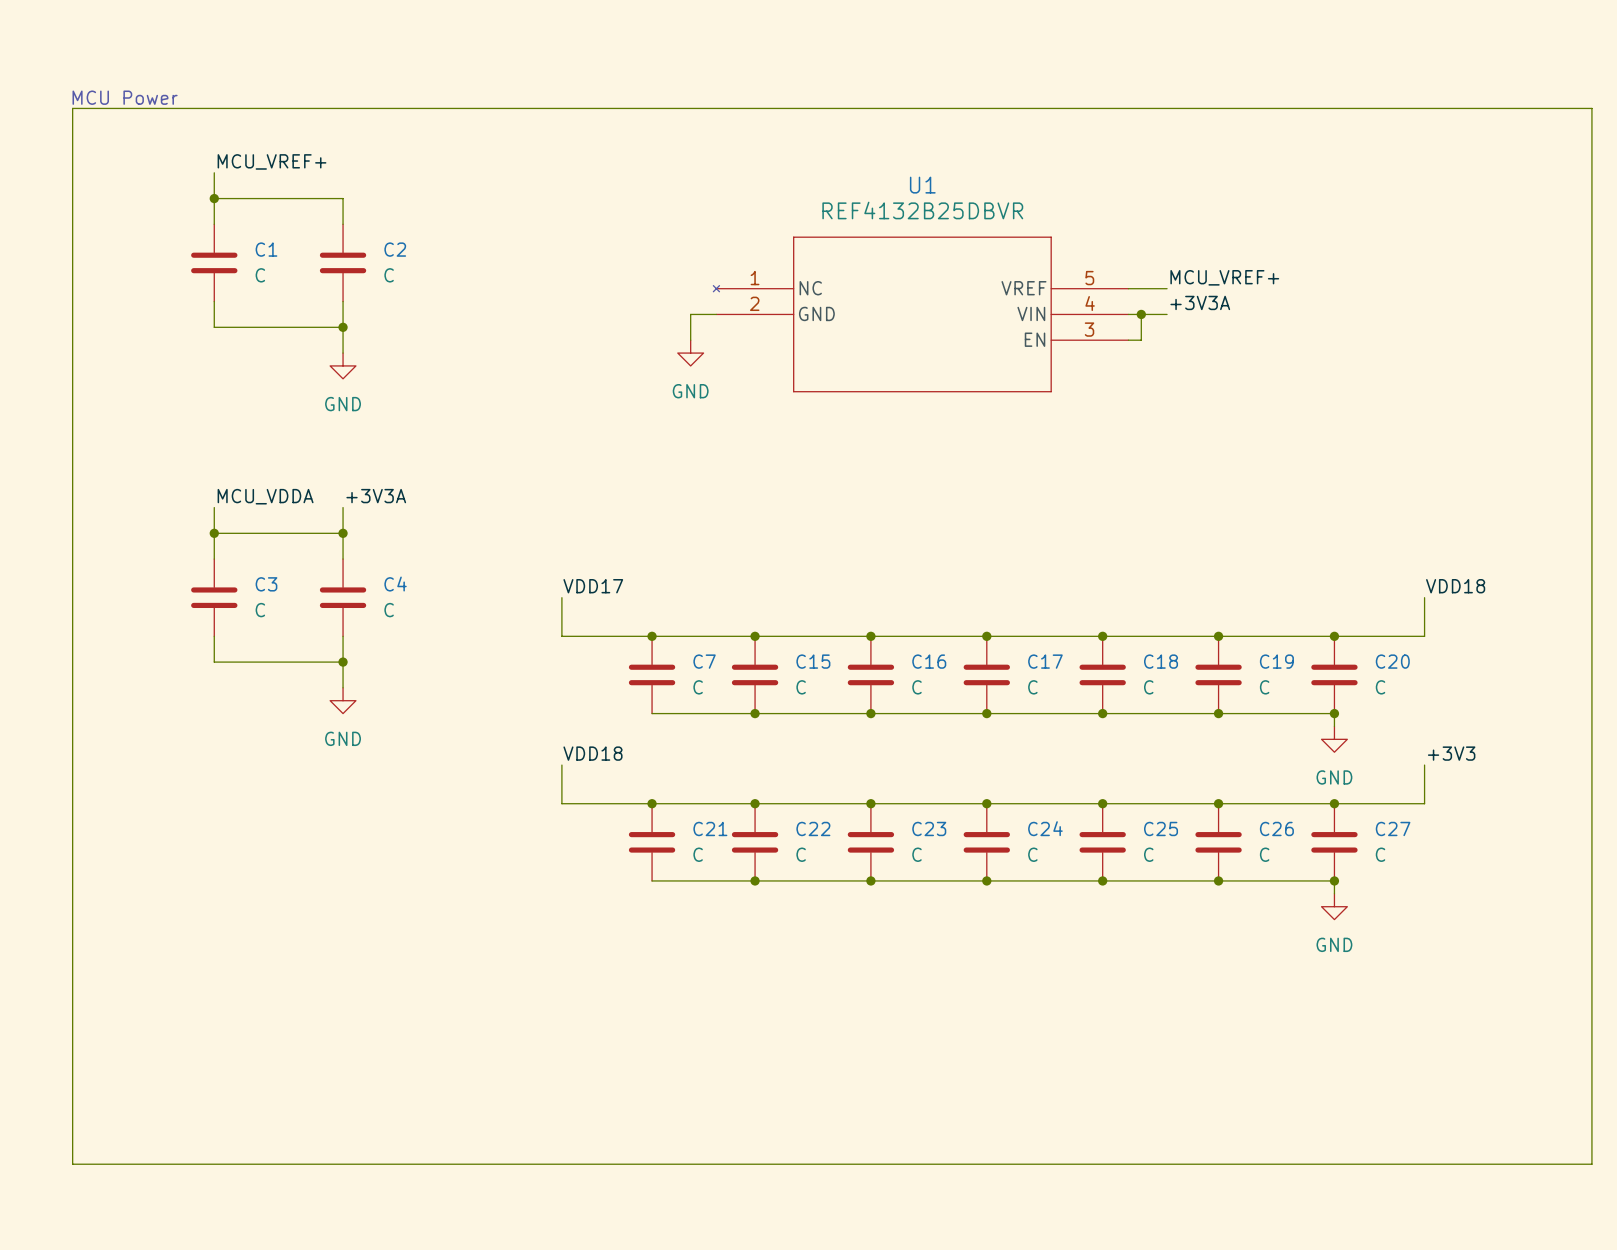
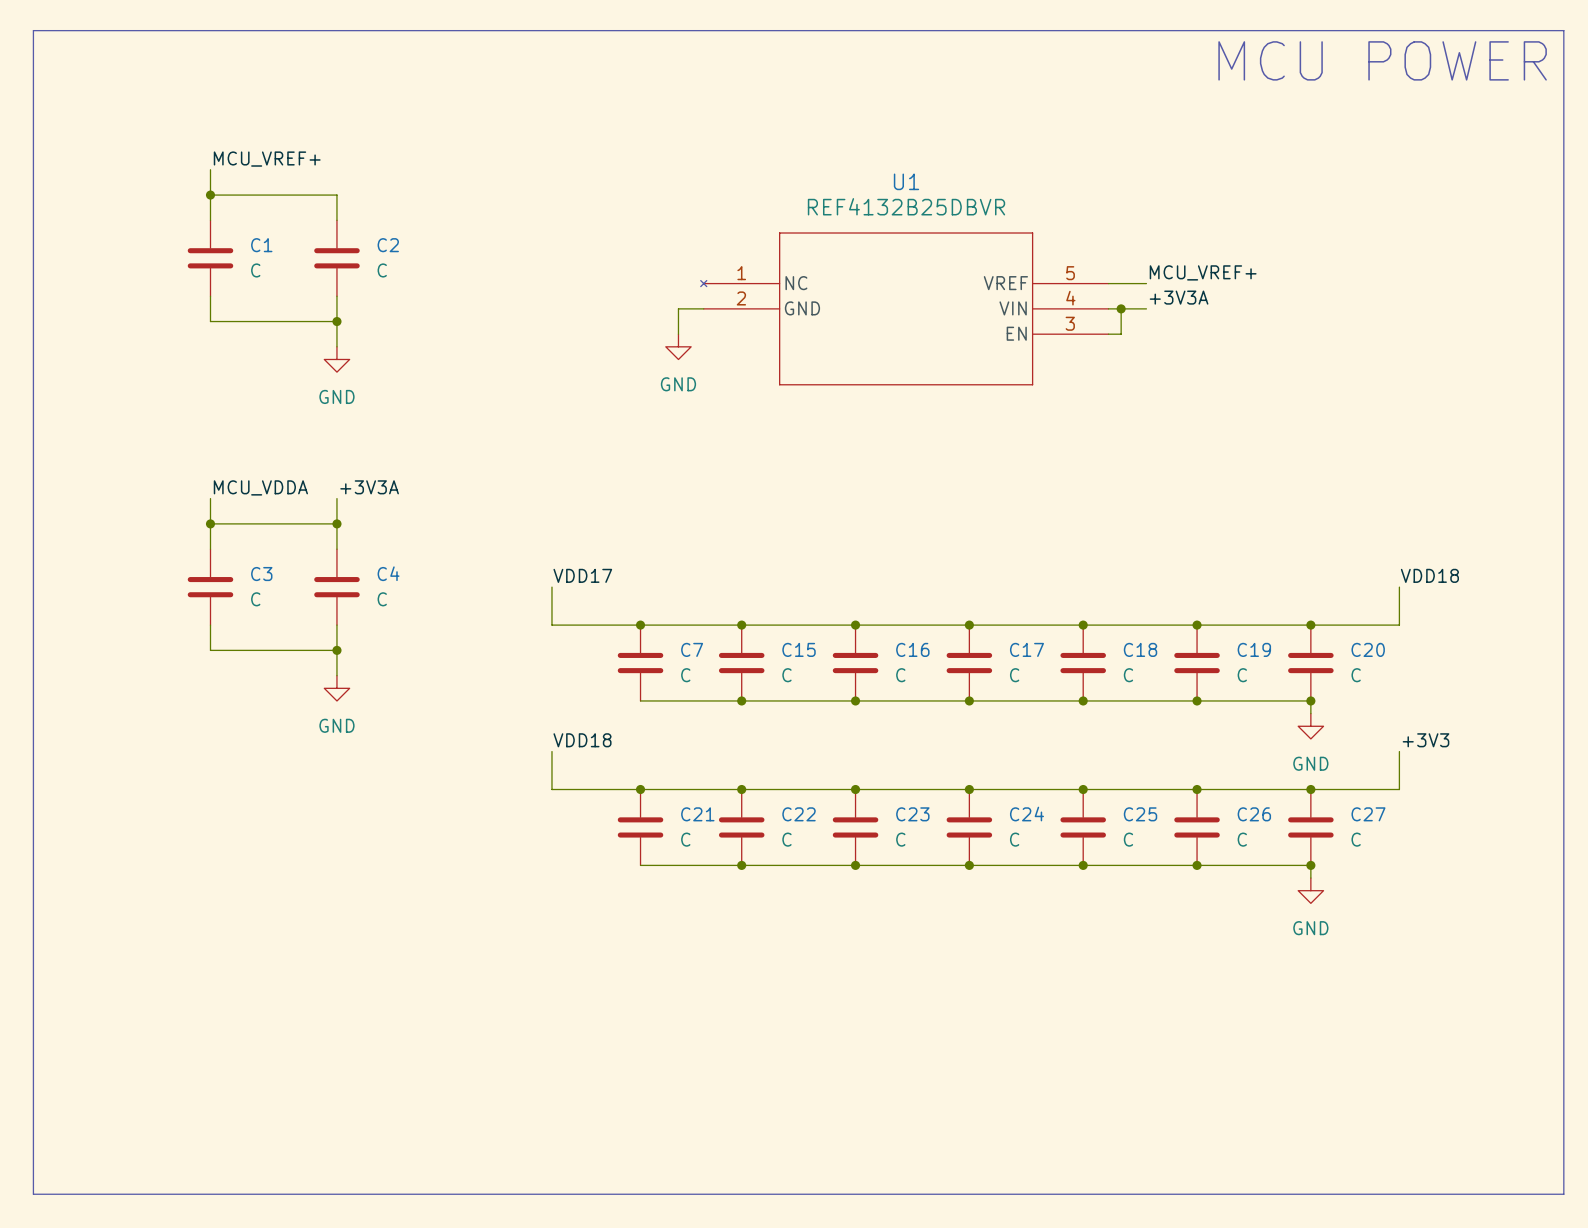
line: none -> (33, 30) (1563, 30) (1563, 1194) (33, 1194) (33, 30)
text: none -> MCU POWER (1382, 60)
text: MCU Power (125, 97) -> none
wire: (72, 108) (72, 1164) (1591, 1164) (1591, 108) (72, 108) -> none

